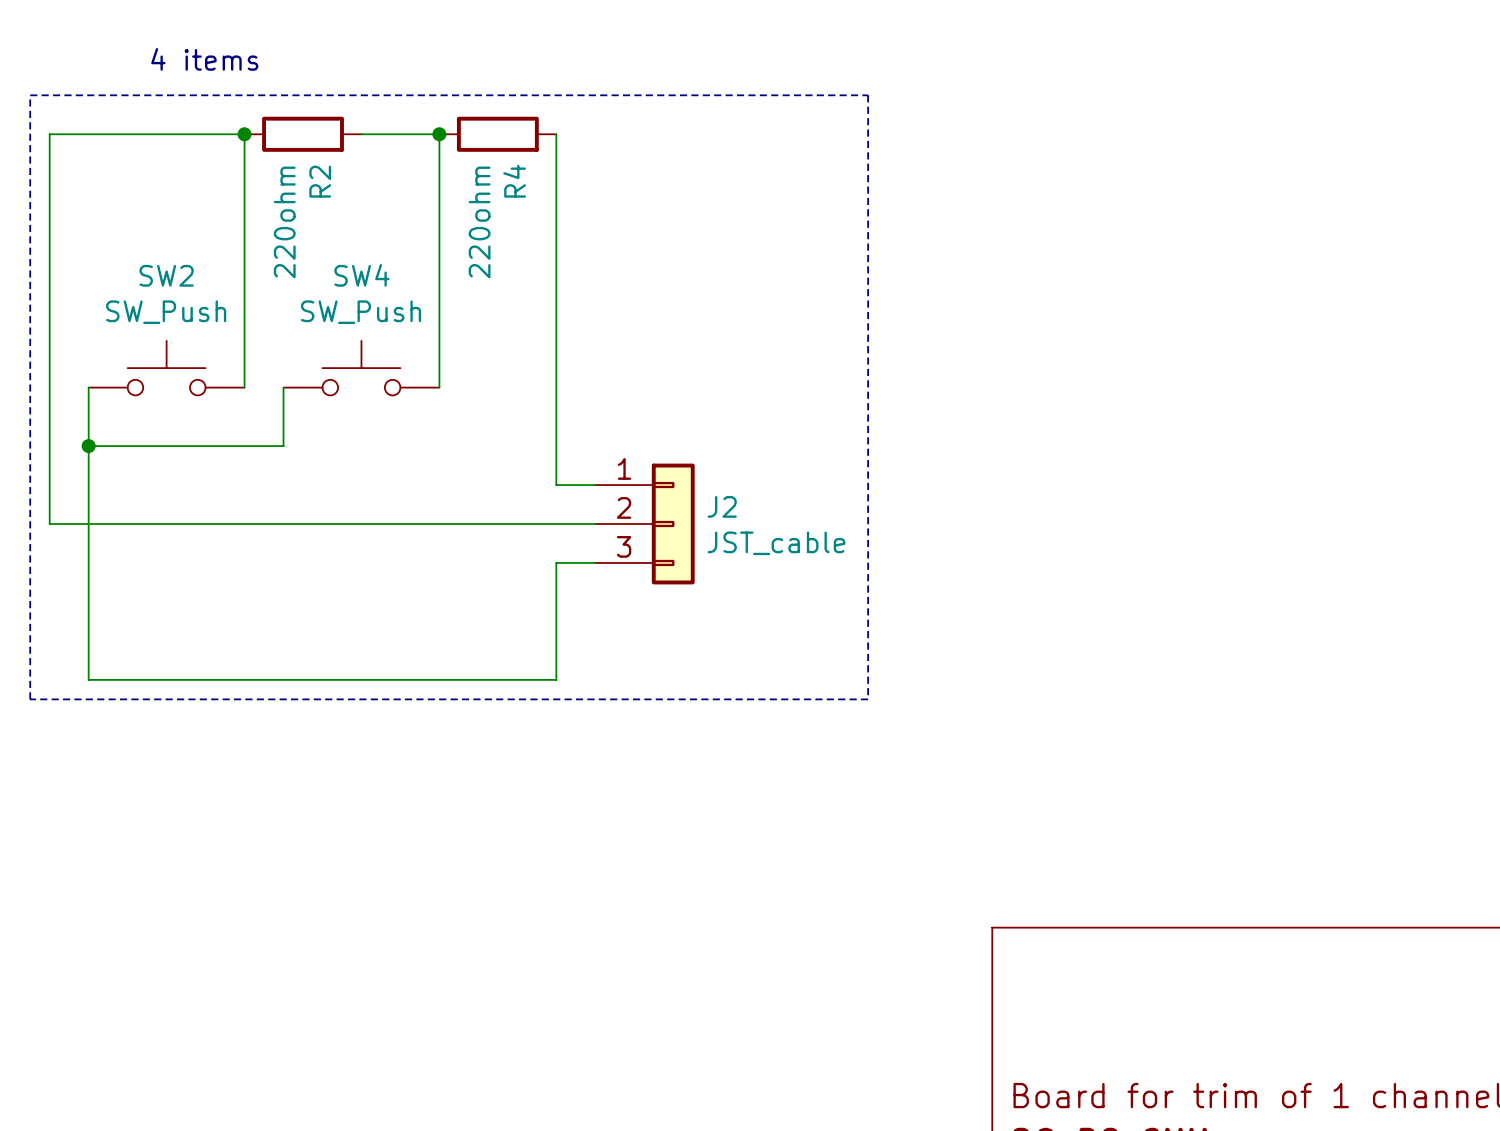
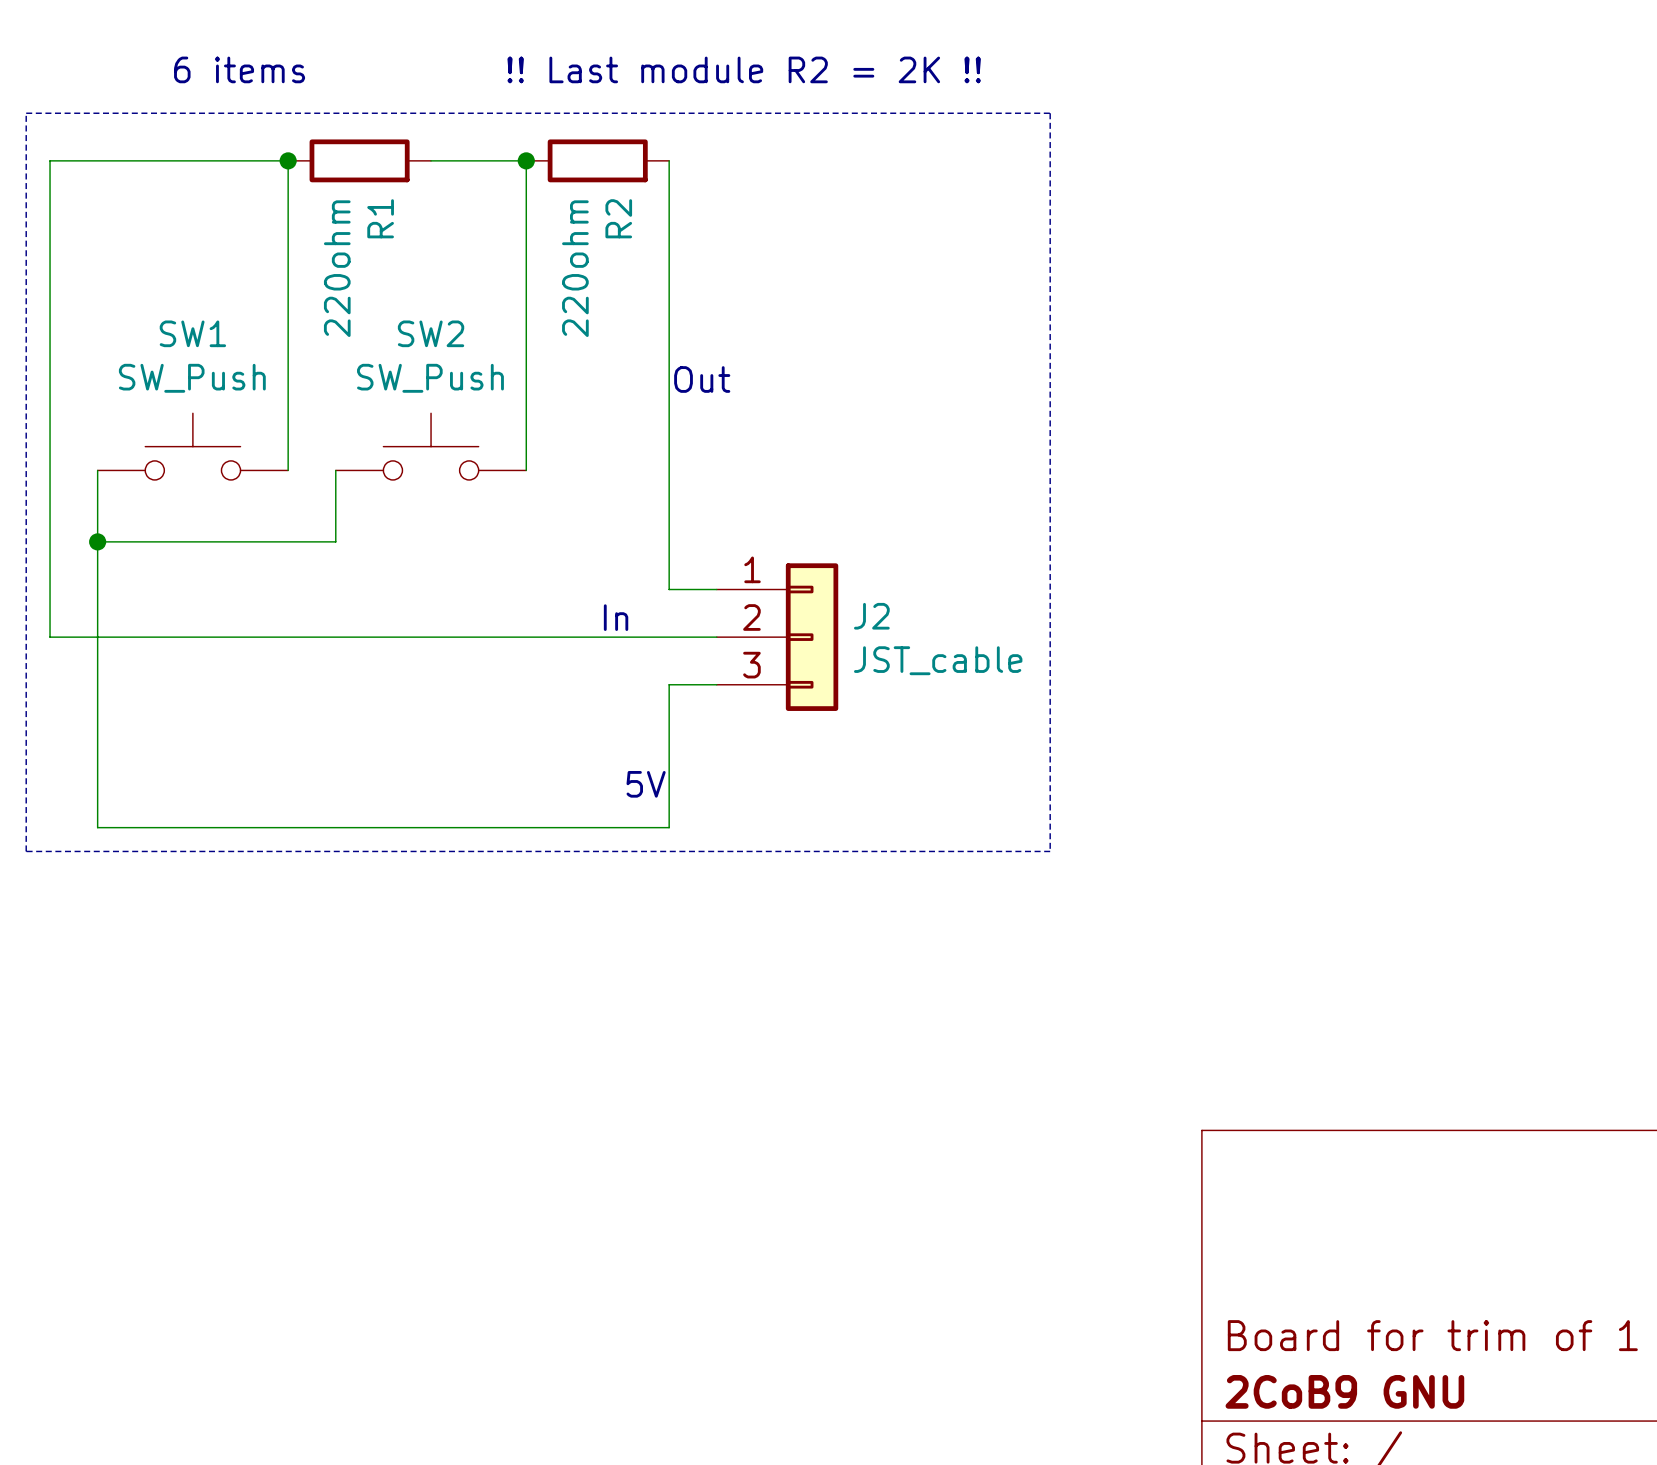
text: 4 items (204, 59) -> 6 items (239, 69)
text: none -> !! Last module R2 = 2K !! (744, 69)
R2 name: R2 (320, 181) -> R1 (380, 218)
R4 name: R4 (514, 181) -> R2 (618, 218)
SW2 name: SW2 (166, 275) -> SW1 (192, 333)
SW4 name: SW4 (361, 275) -> SW2 (431, 333)
text: none -> Out (702, 379)
text: none -> In (616, 617)
text: none -> 5V (646, 784)

